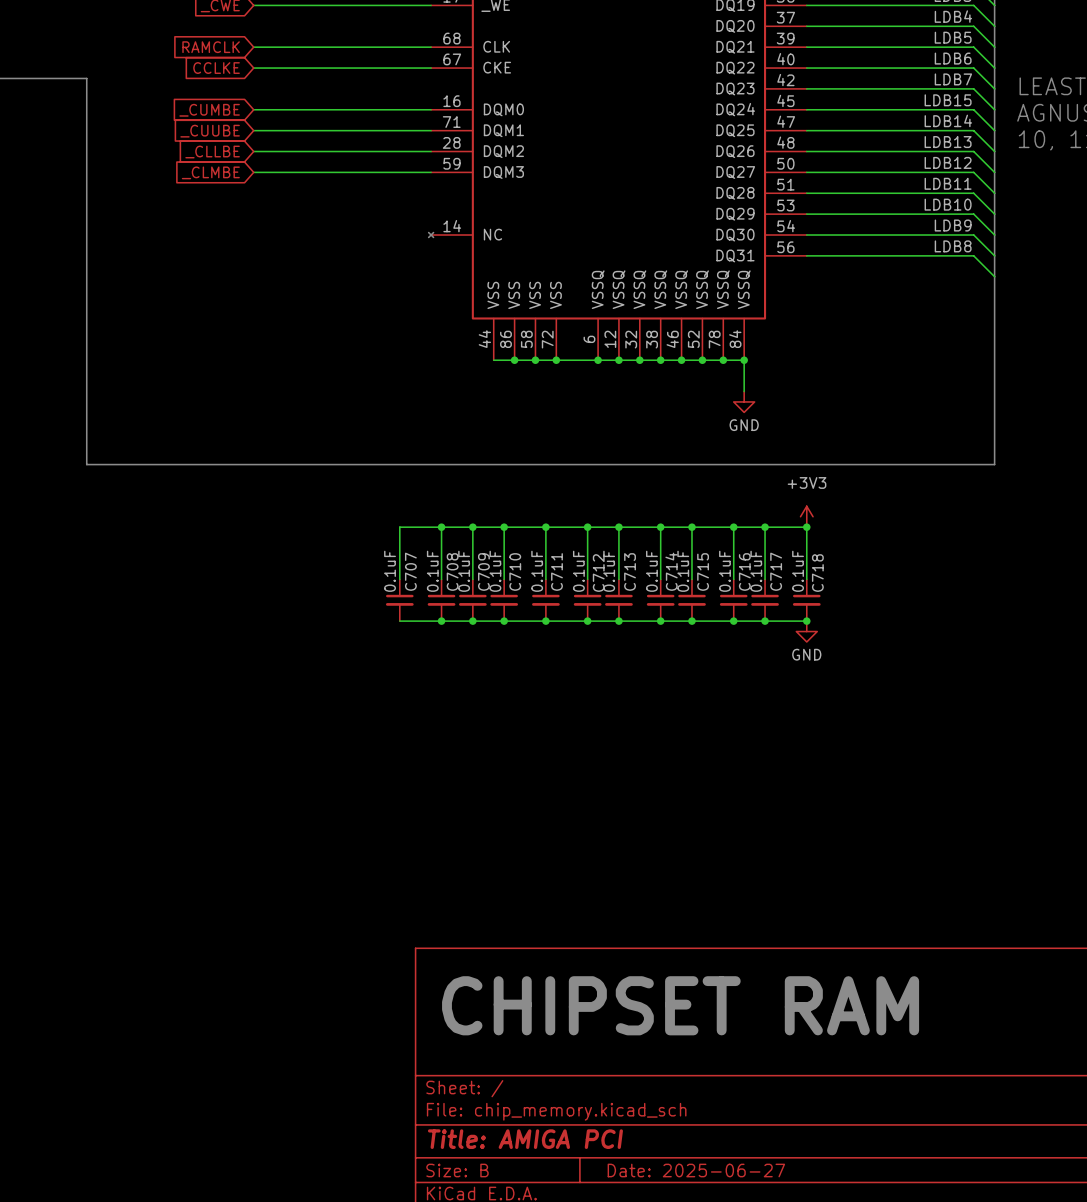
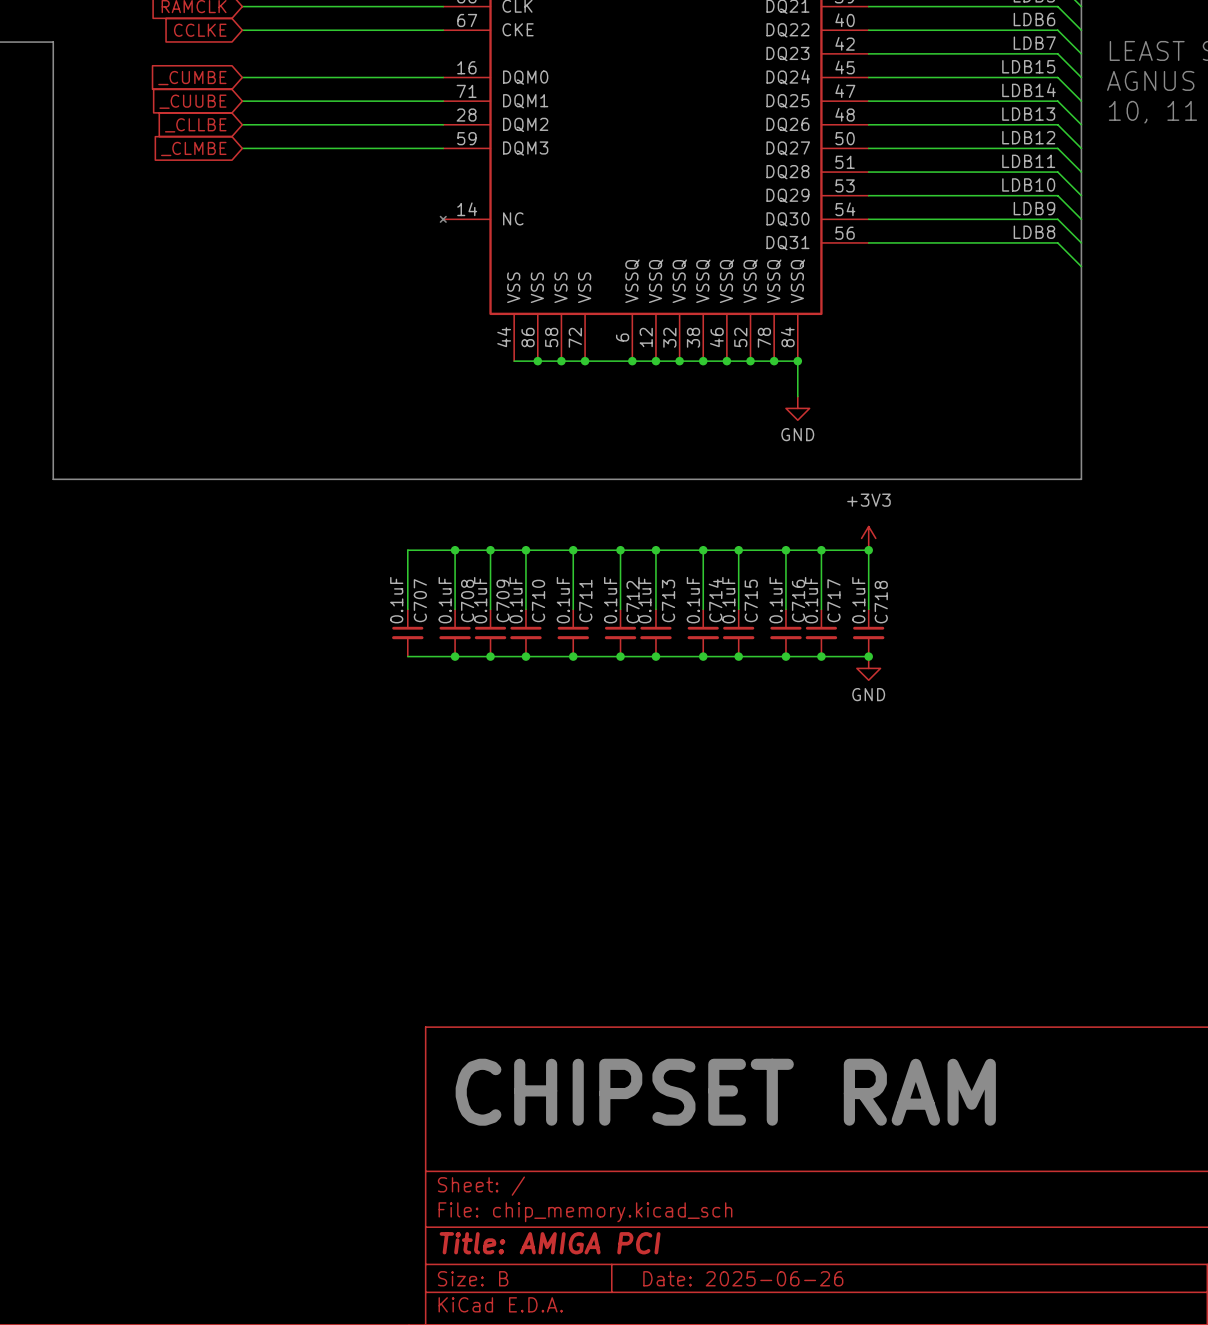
title block: Date: 2025-06-27 (696, 1170) -> Date: 2025-06-26 (743, 1278)

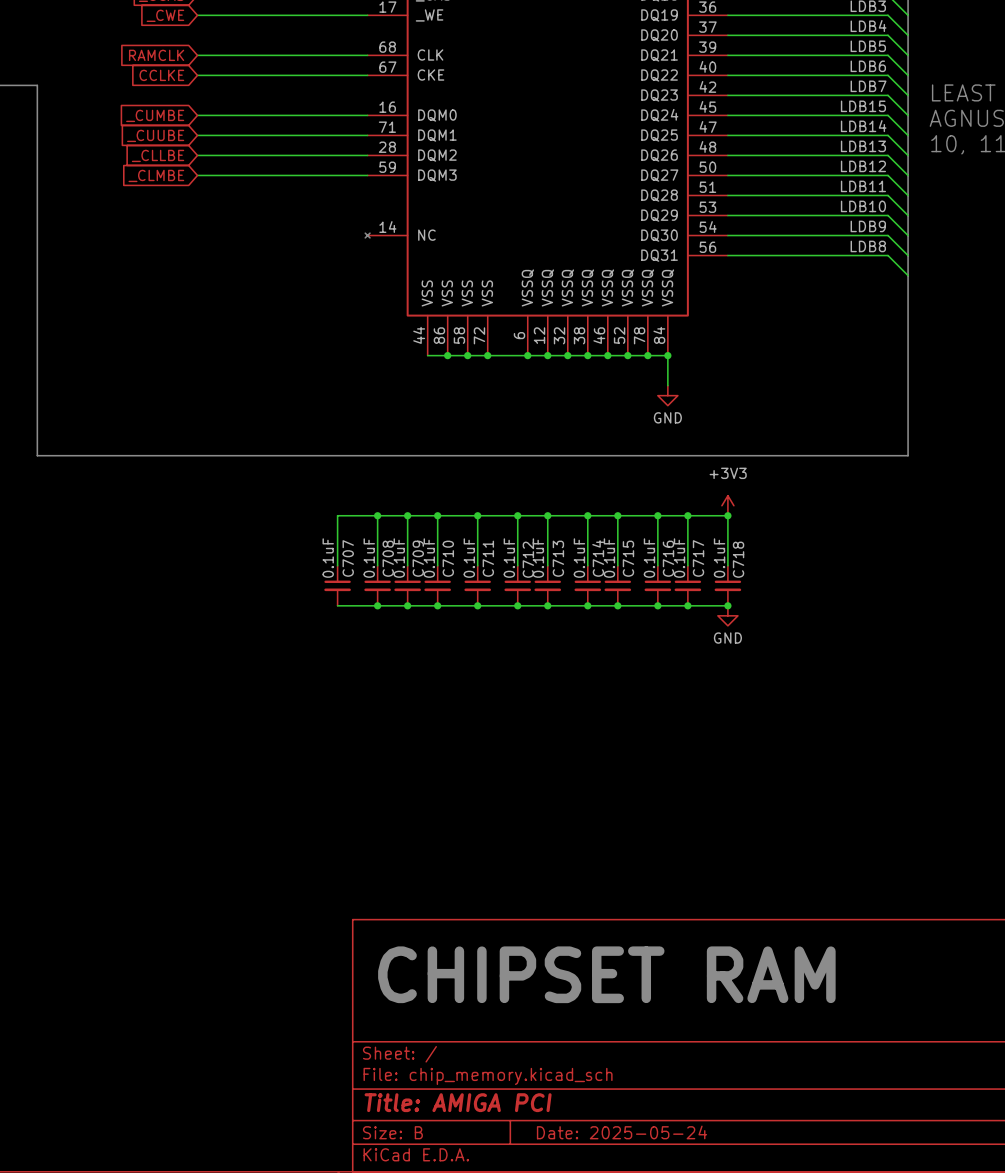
title block: Date: 2025-06-26 (743, 1278) -> Date: 2025-05-24 (622, 1132)

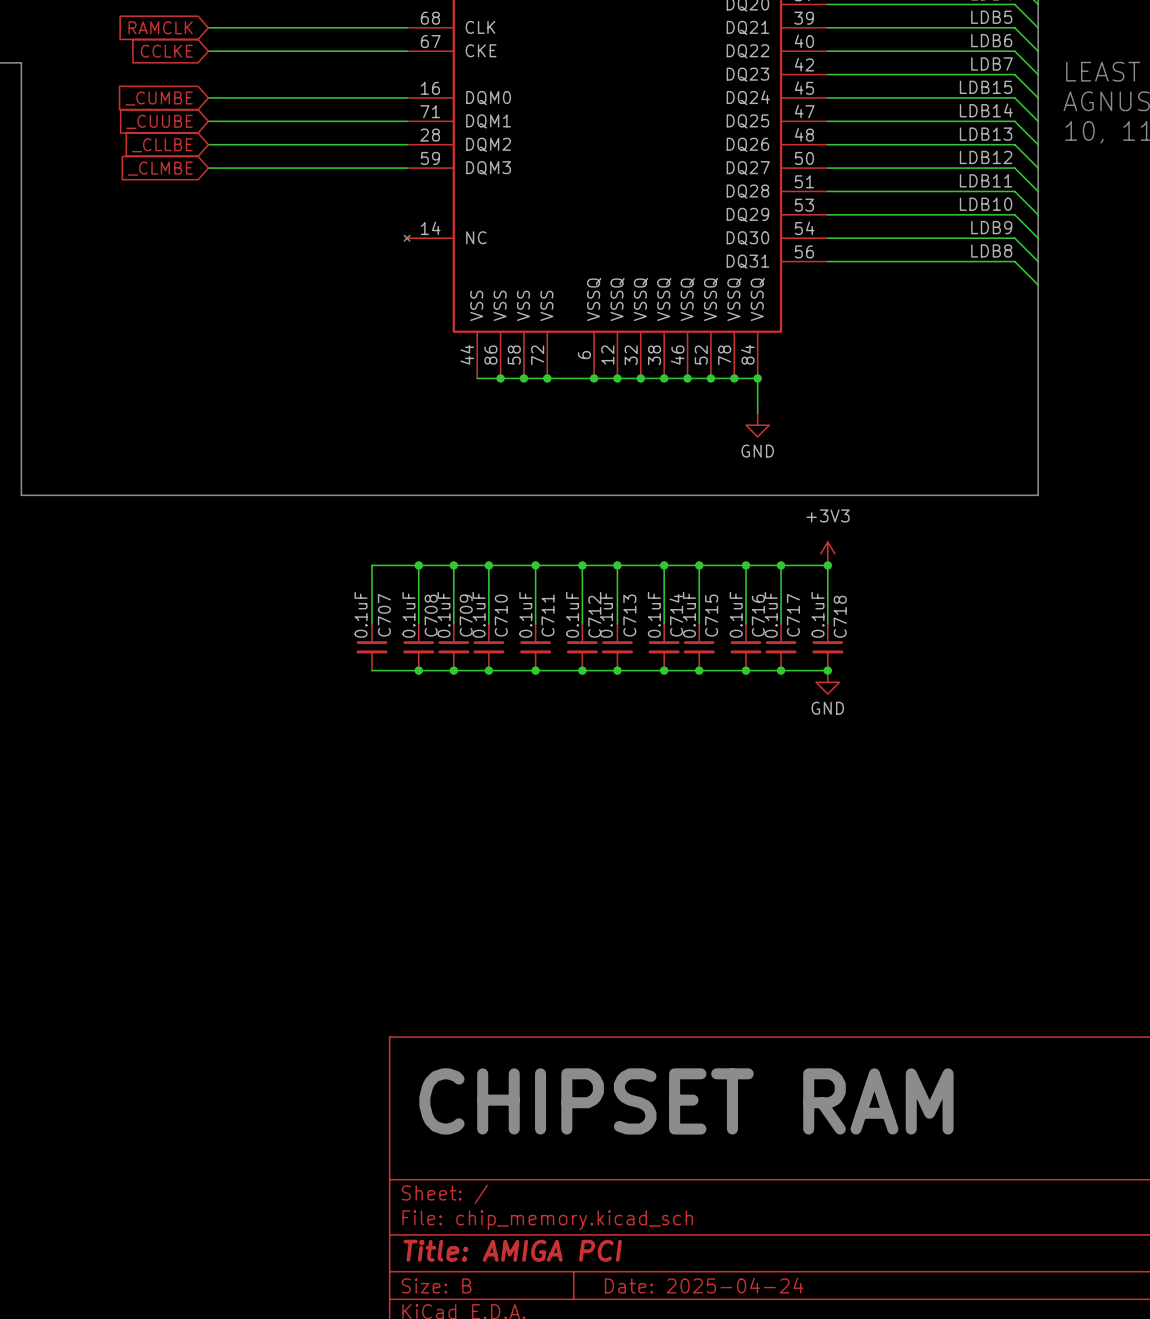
title block: Date: 2025-05-24 (622, 1132) -> Date: 2025-04-24 (704, 1285)

